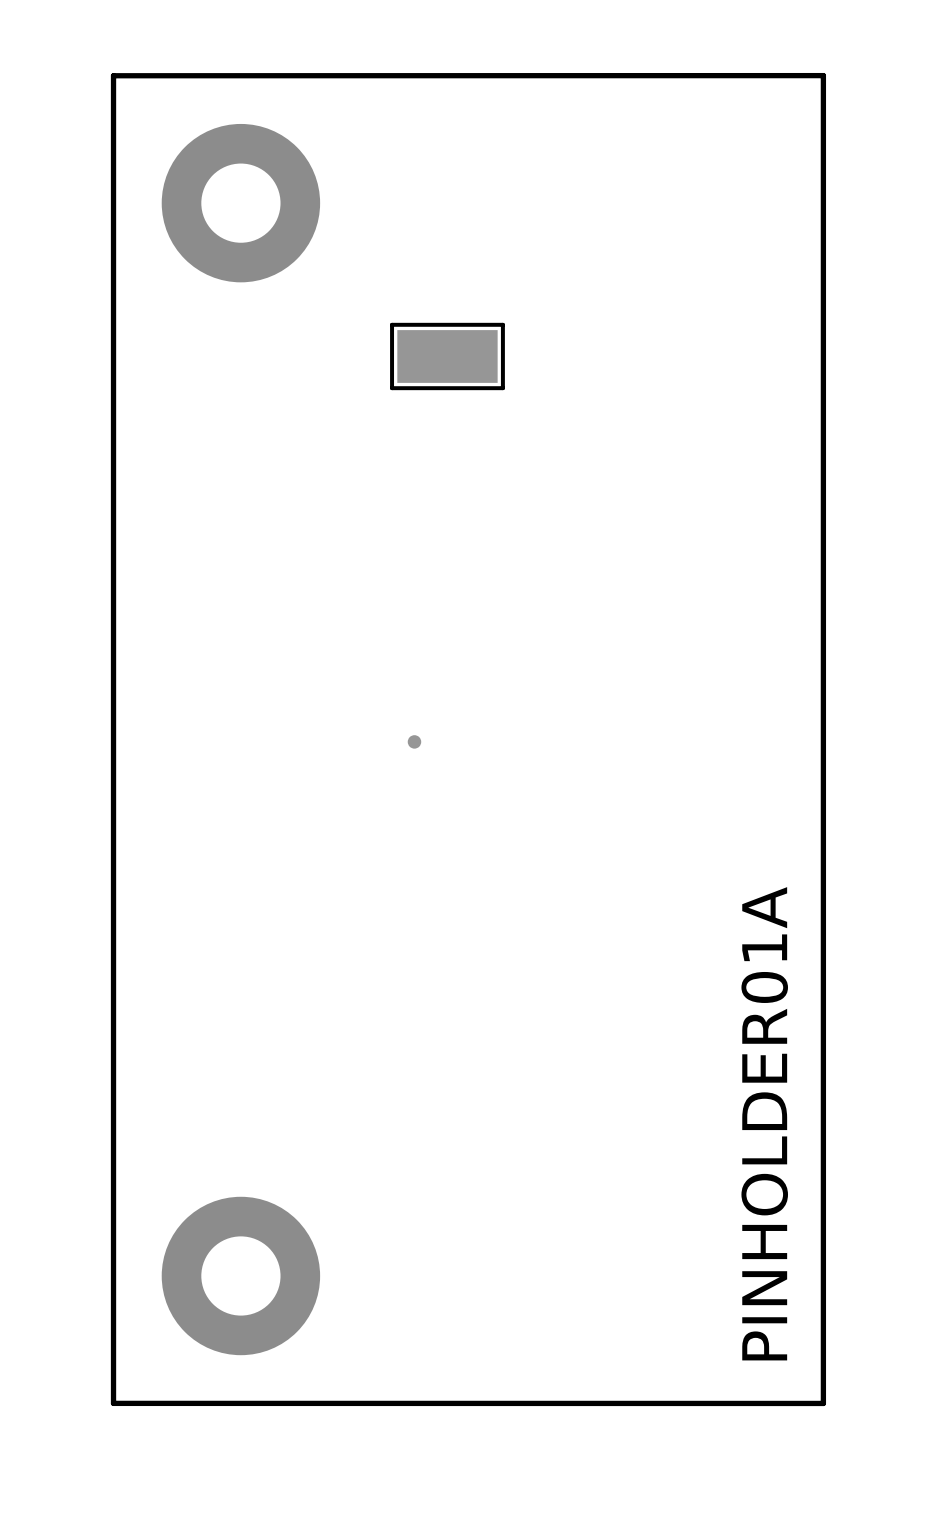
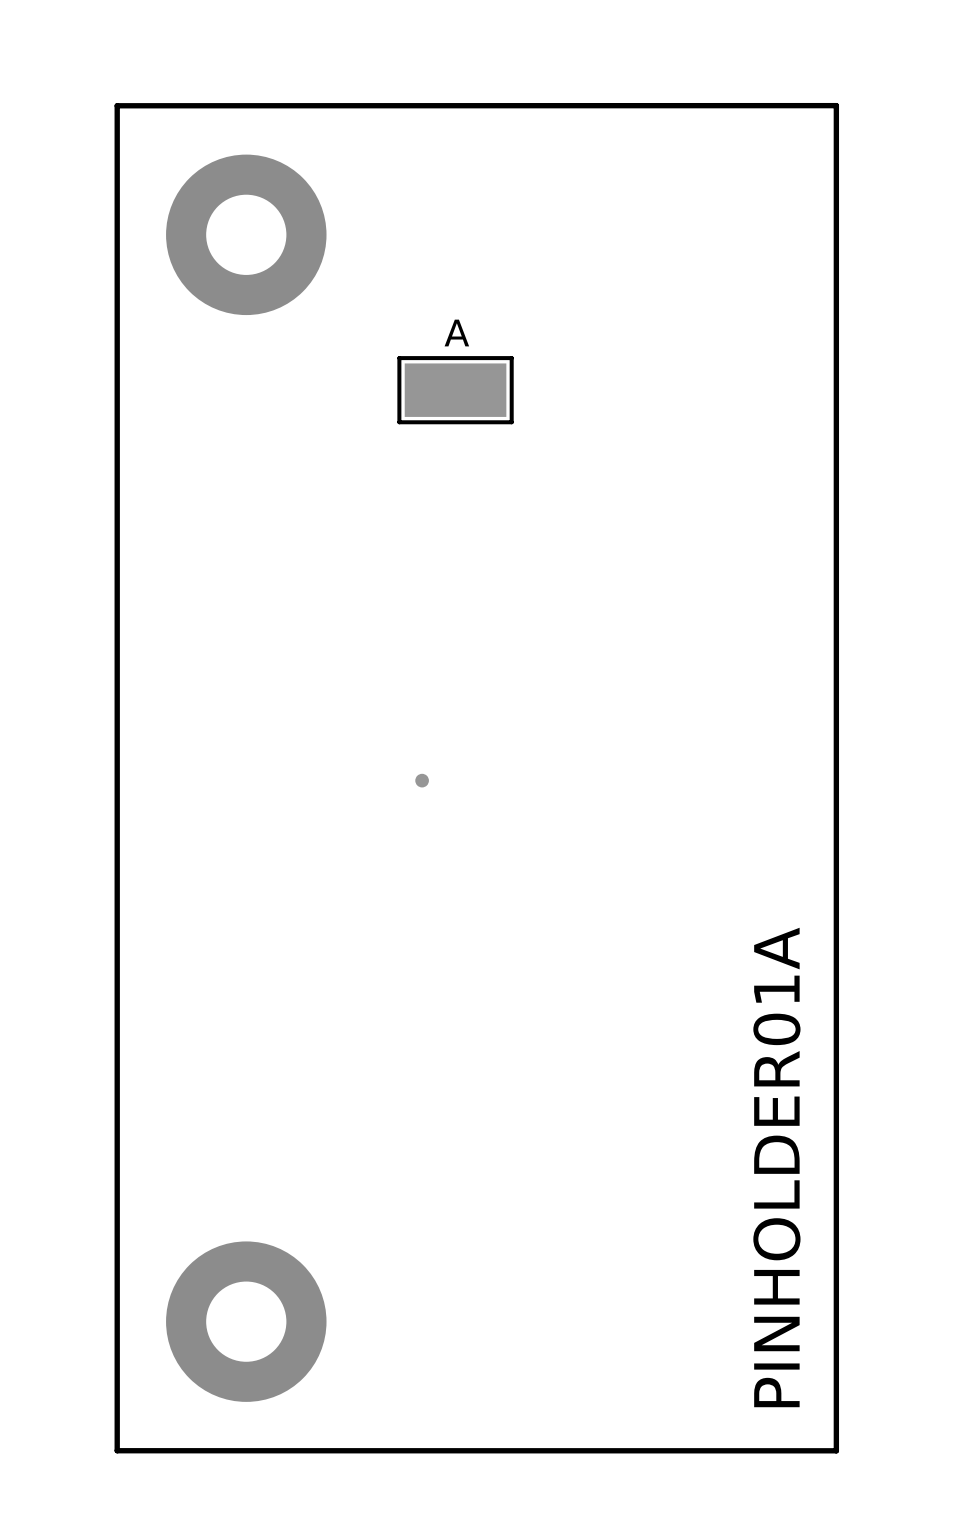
text: none -> A (456, 333)

